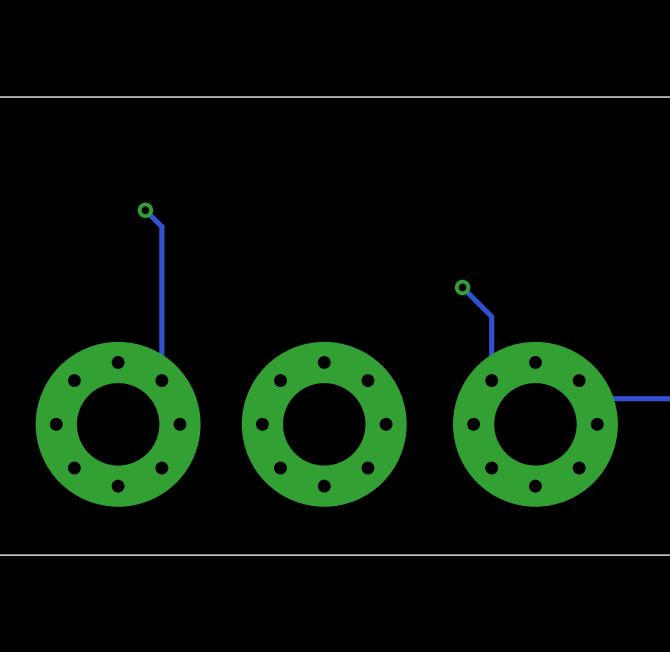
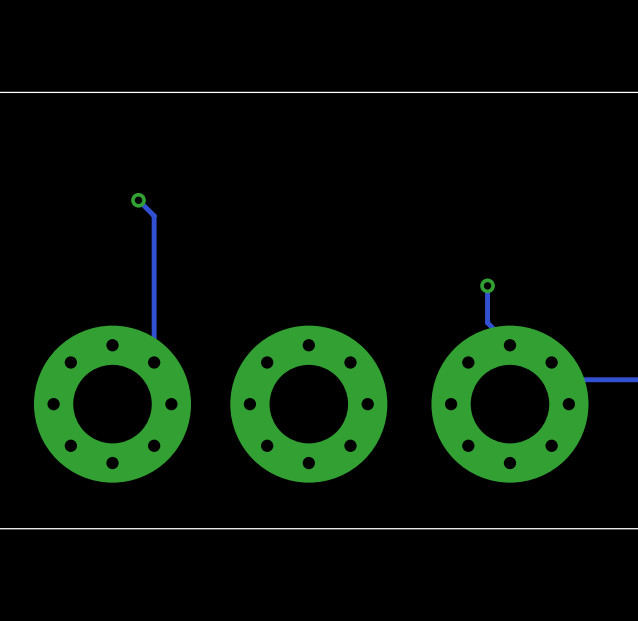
track: (462, 287) (491, 316) (491, 380) -> none
via position: (462, 287) -> (487, 285)
track: none -> (487, 285) (487, 322) (509, 345)

